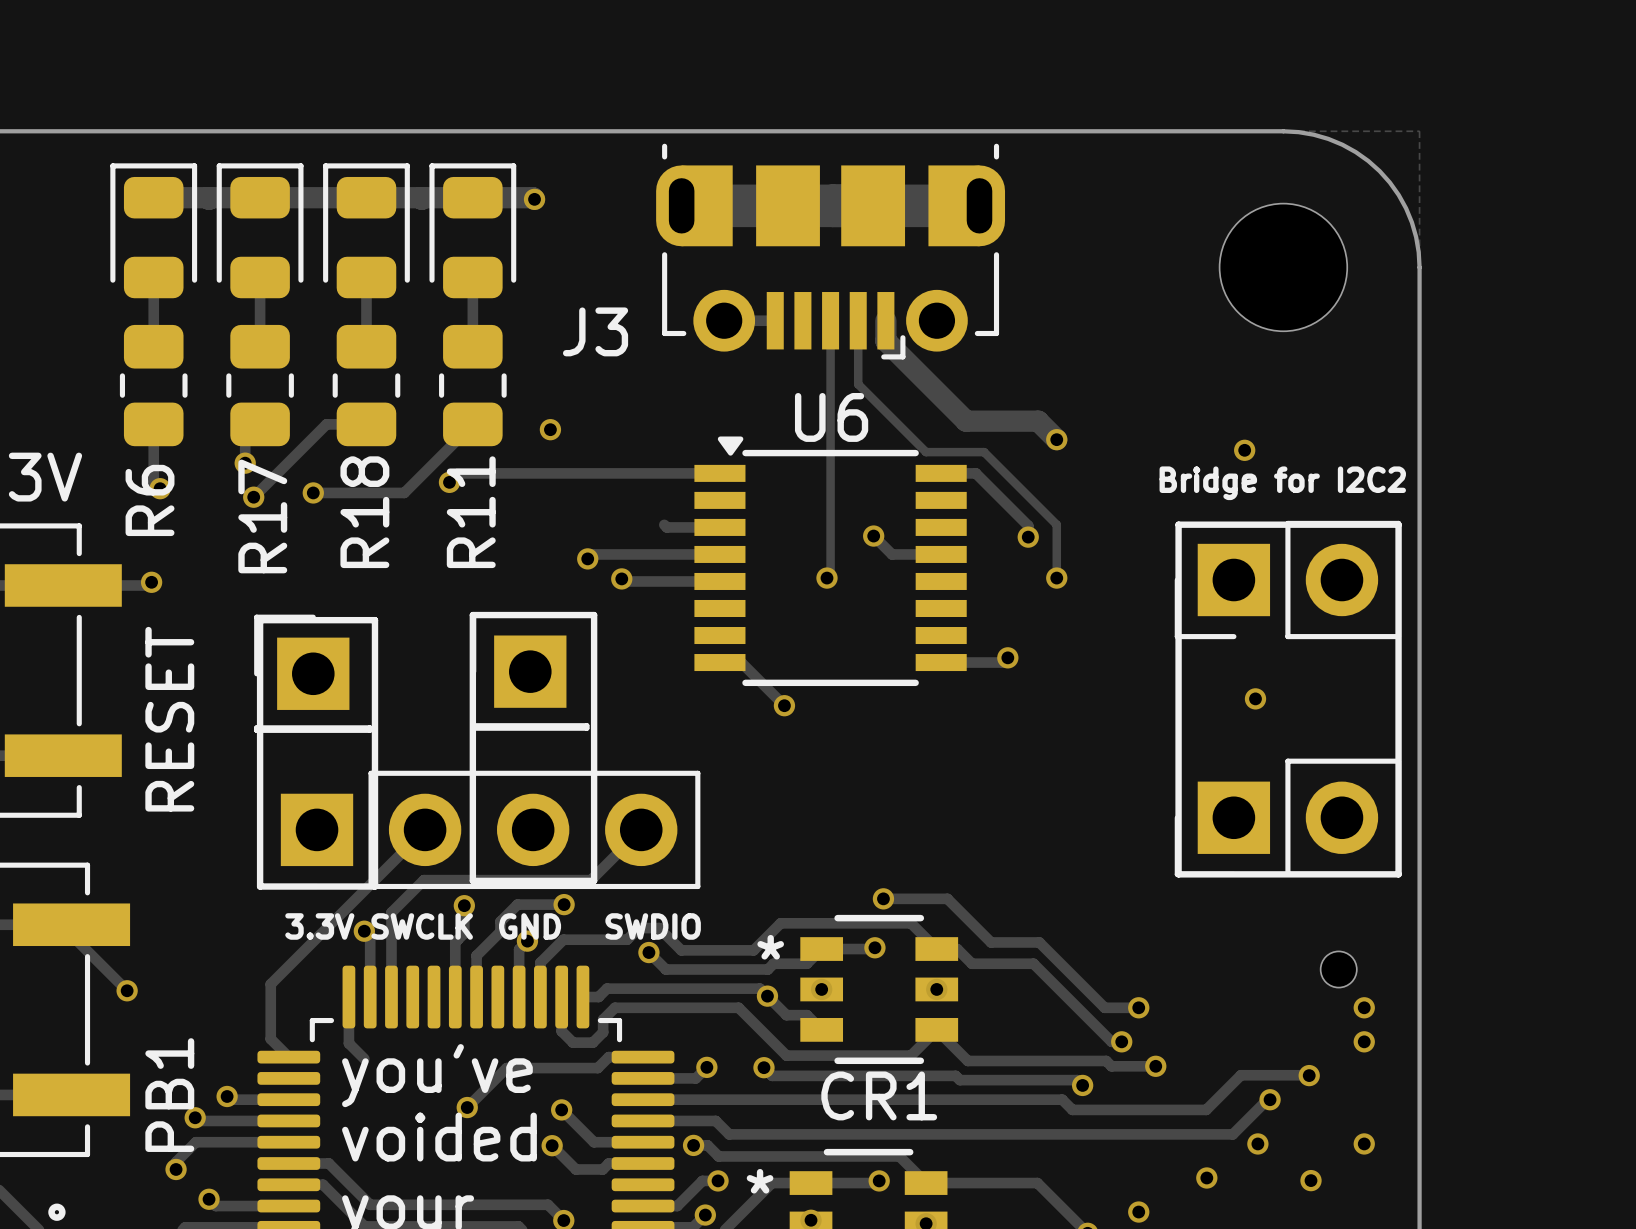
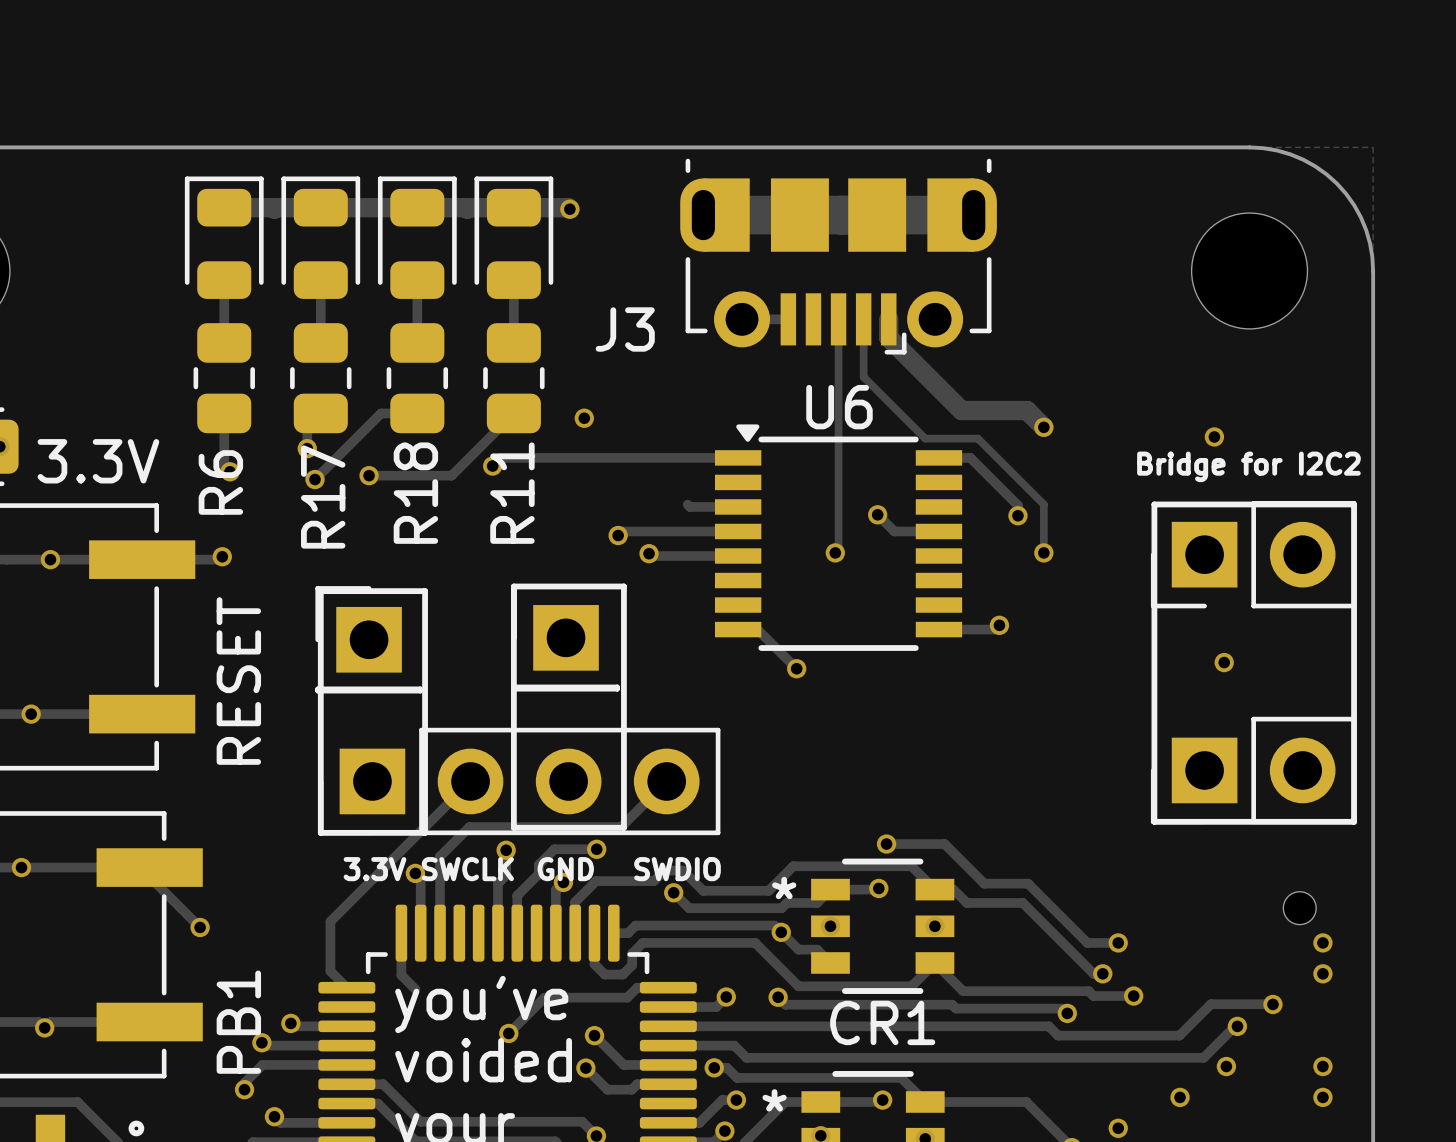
via position: (1311, 1180) -> (1322, 1097)

